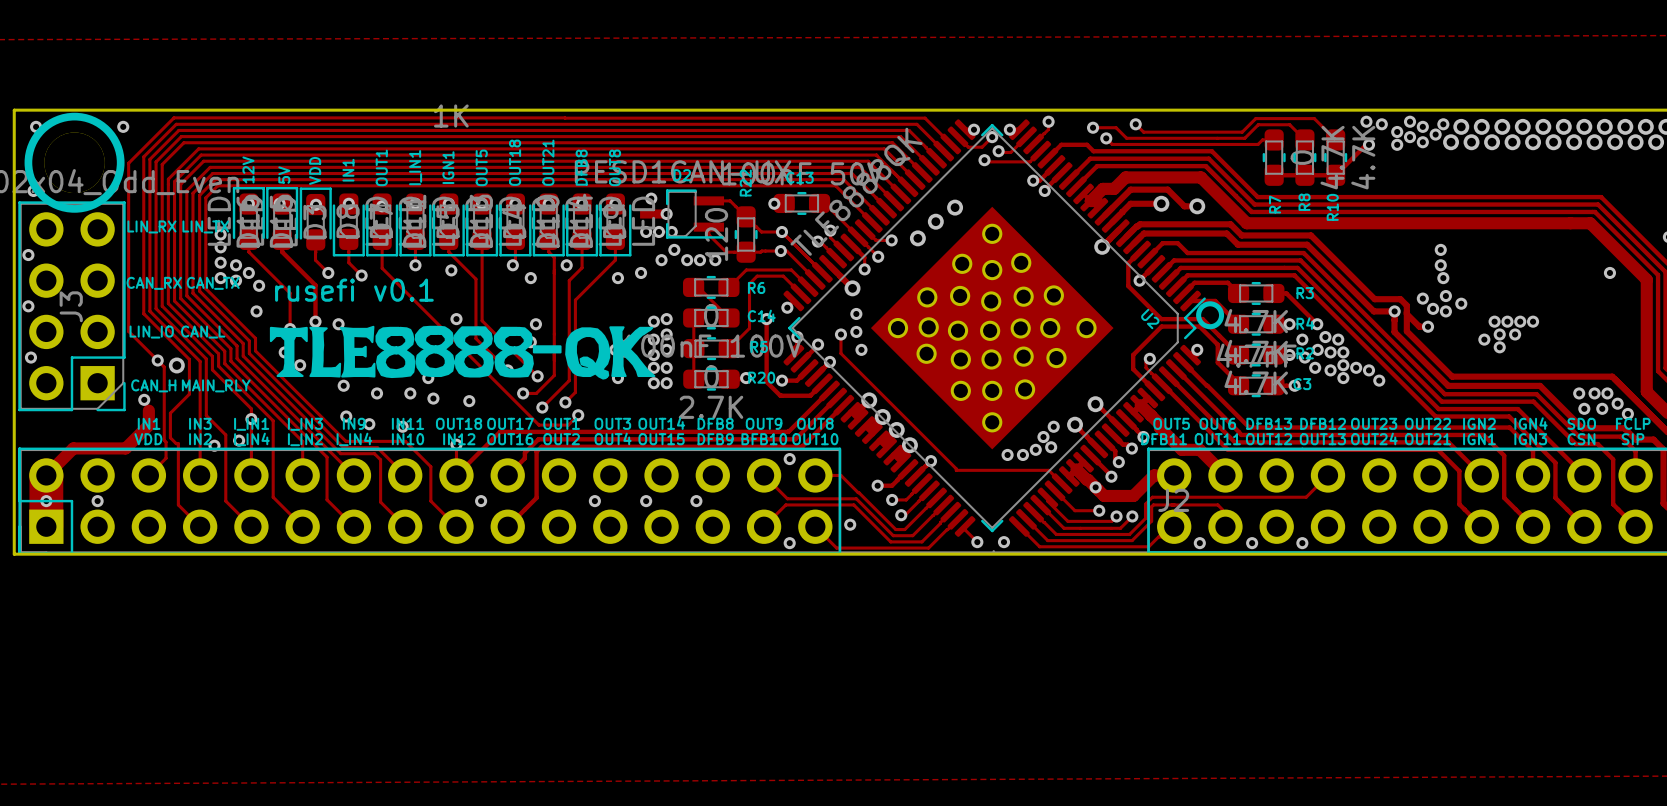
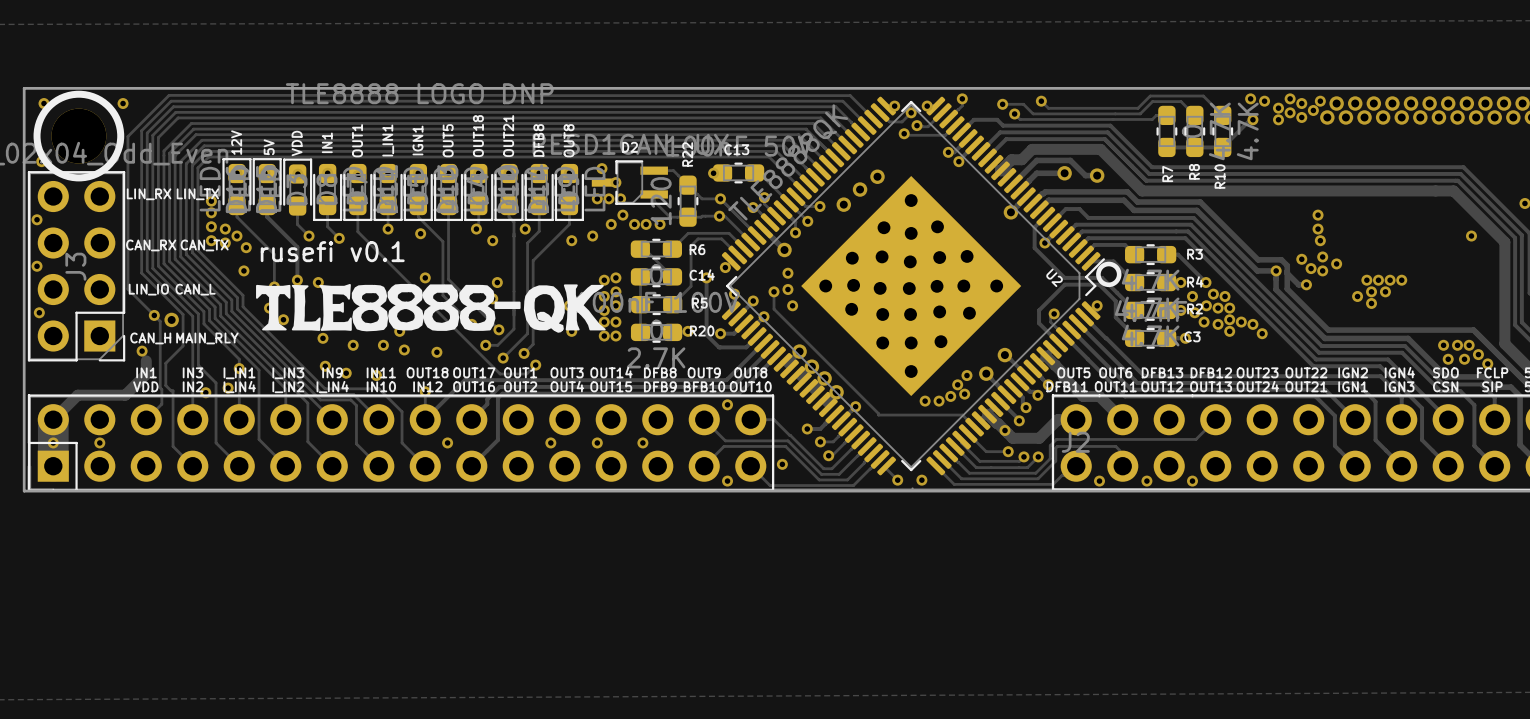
drawing shape: [269, 104, 656, 380] -> [256, 83, 606, 333]

